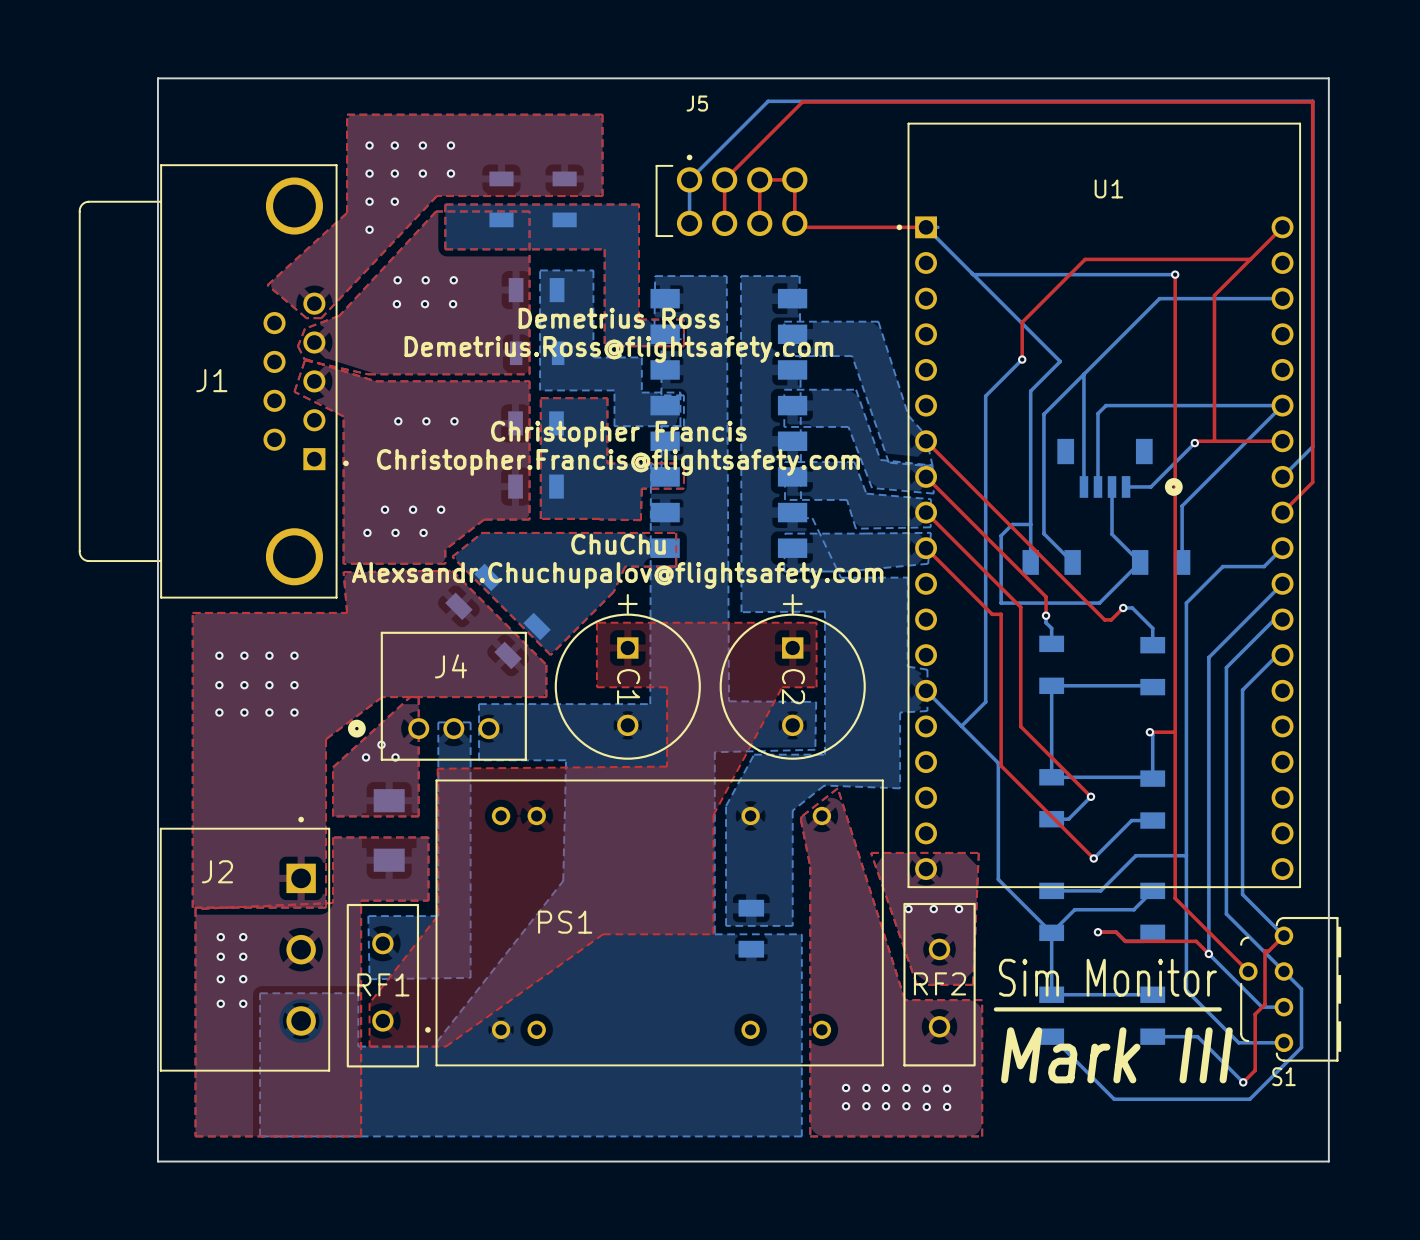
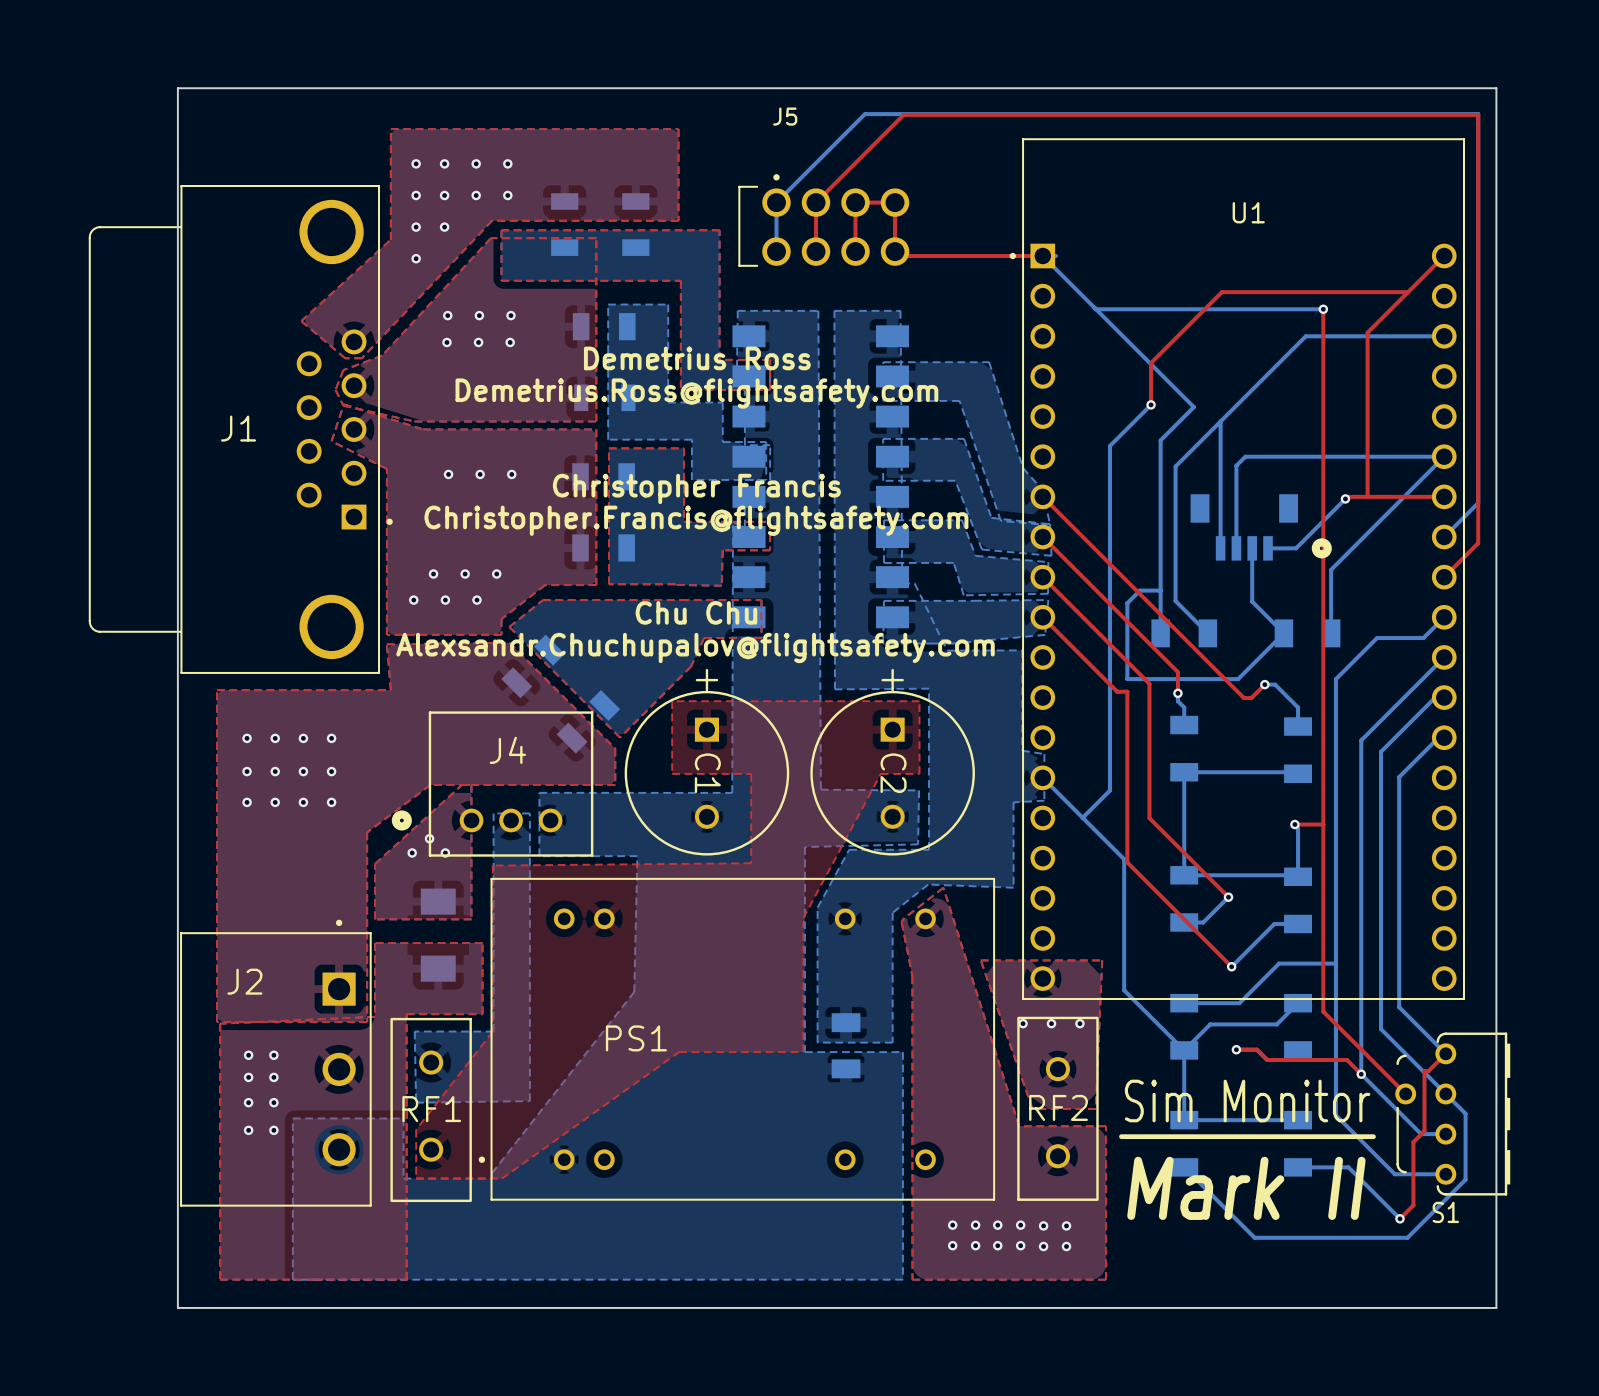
text: ChuChu (618, 544) -> Chu Chu (696, 612)
text: Mark III (1116, 1055) -> Mark II (1246, 1188)

